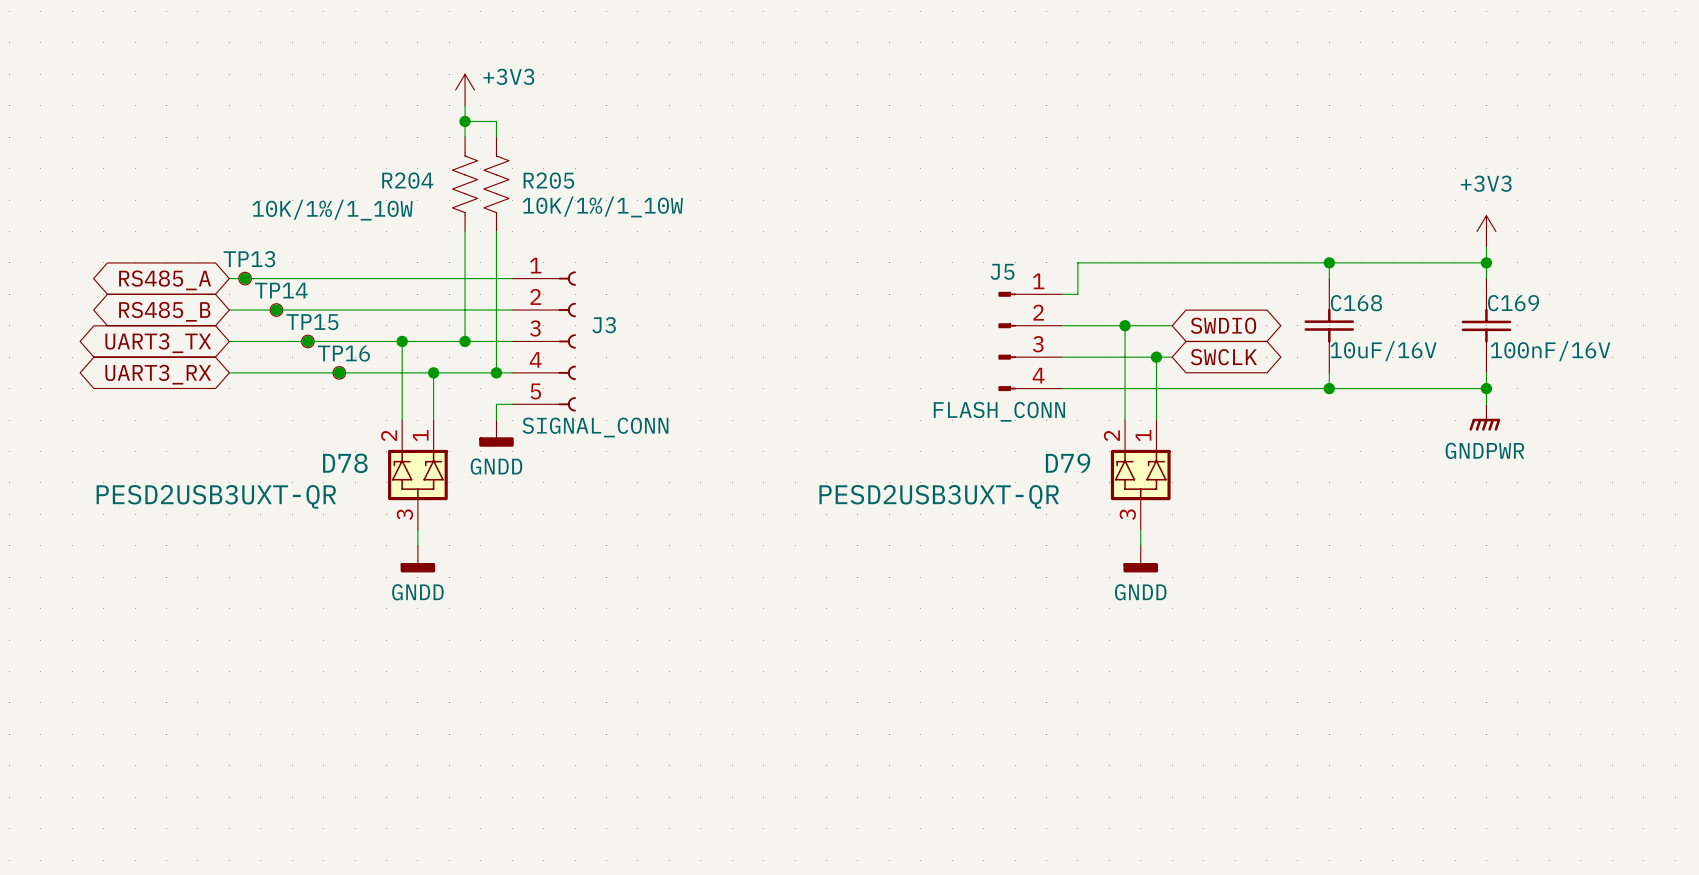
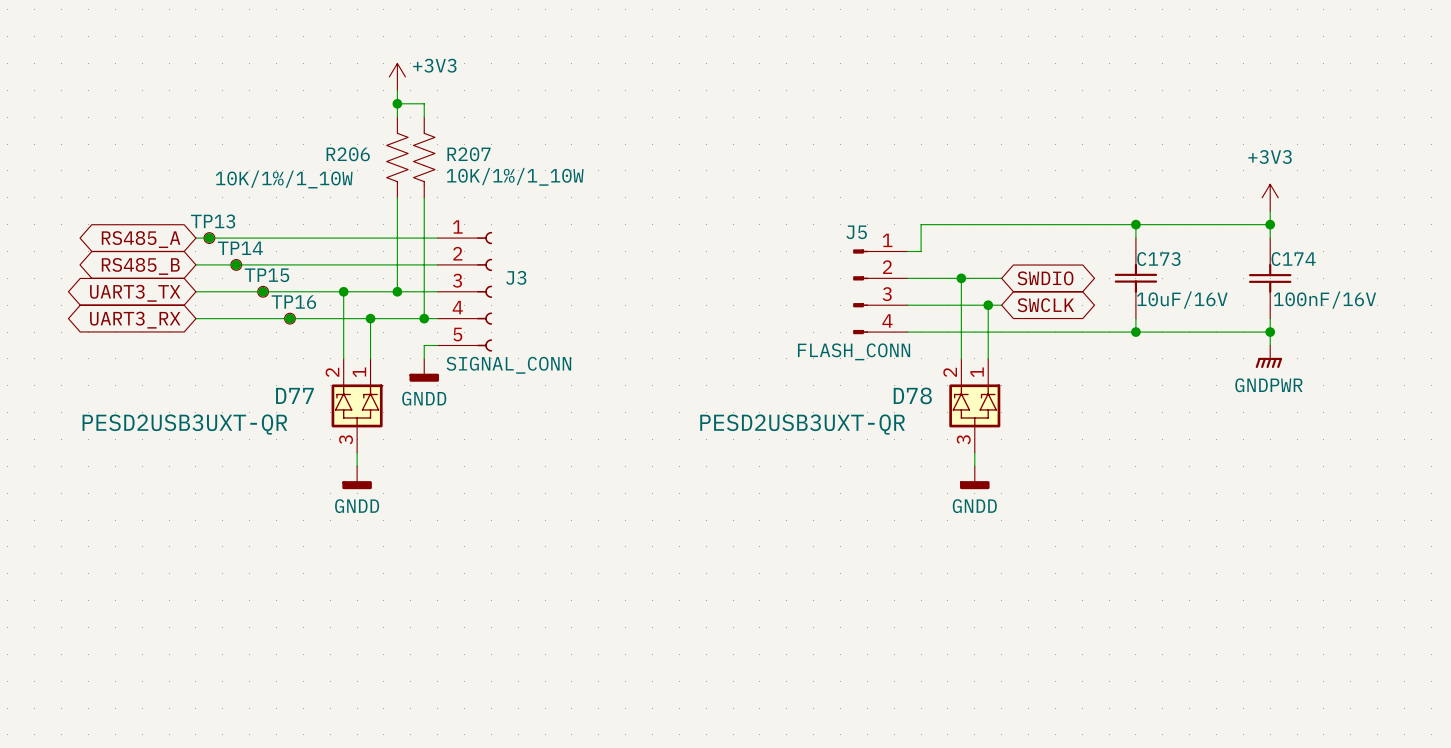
R204 name: R204 (407, 180) -> R206 (348, 154)
R205 name: R205 (548, 180) -> R207 (469, 154)
C168 name: C168 (1356, 303) -> C173 (1158, 259)
C169 name: C169 (1513, 303) -> C174 (1293, 259)
D78 name: D78 (345, 463) -> D77 (294, 395)
D79 name: D79 (1068, 463) -> D78 (912, 395)

